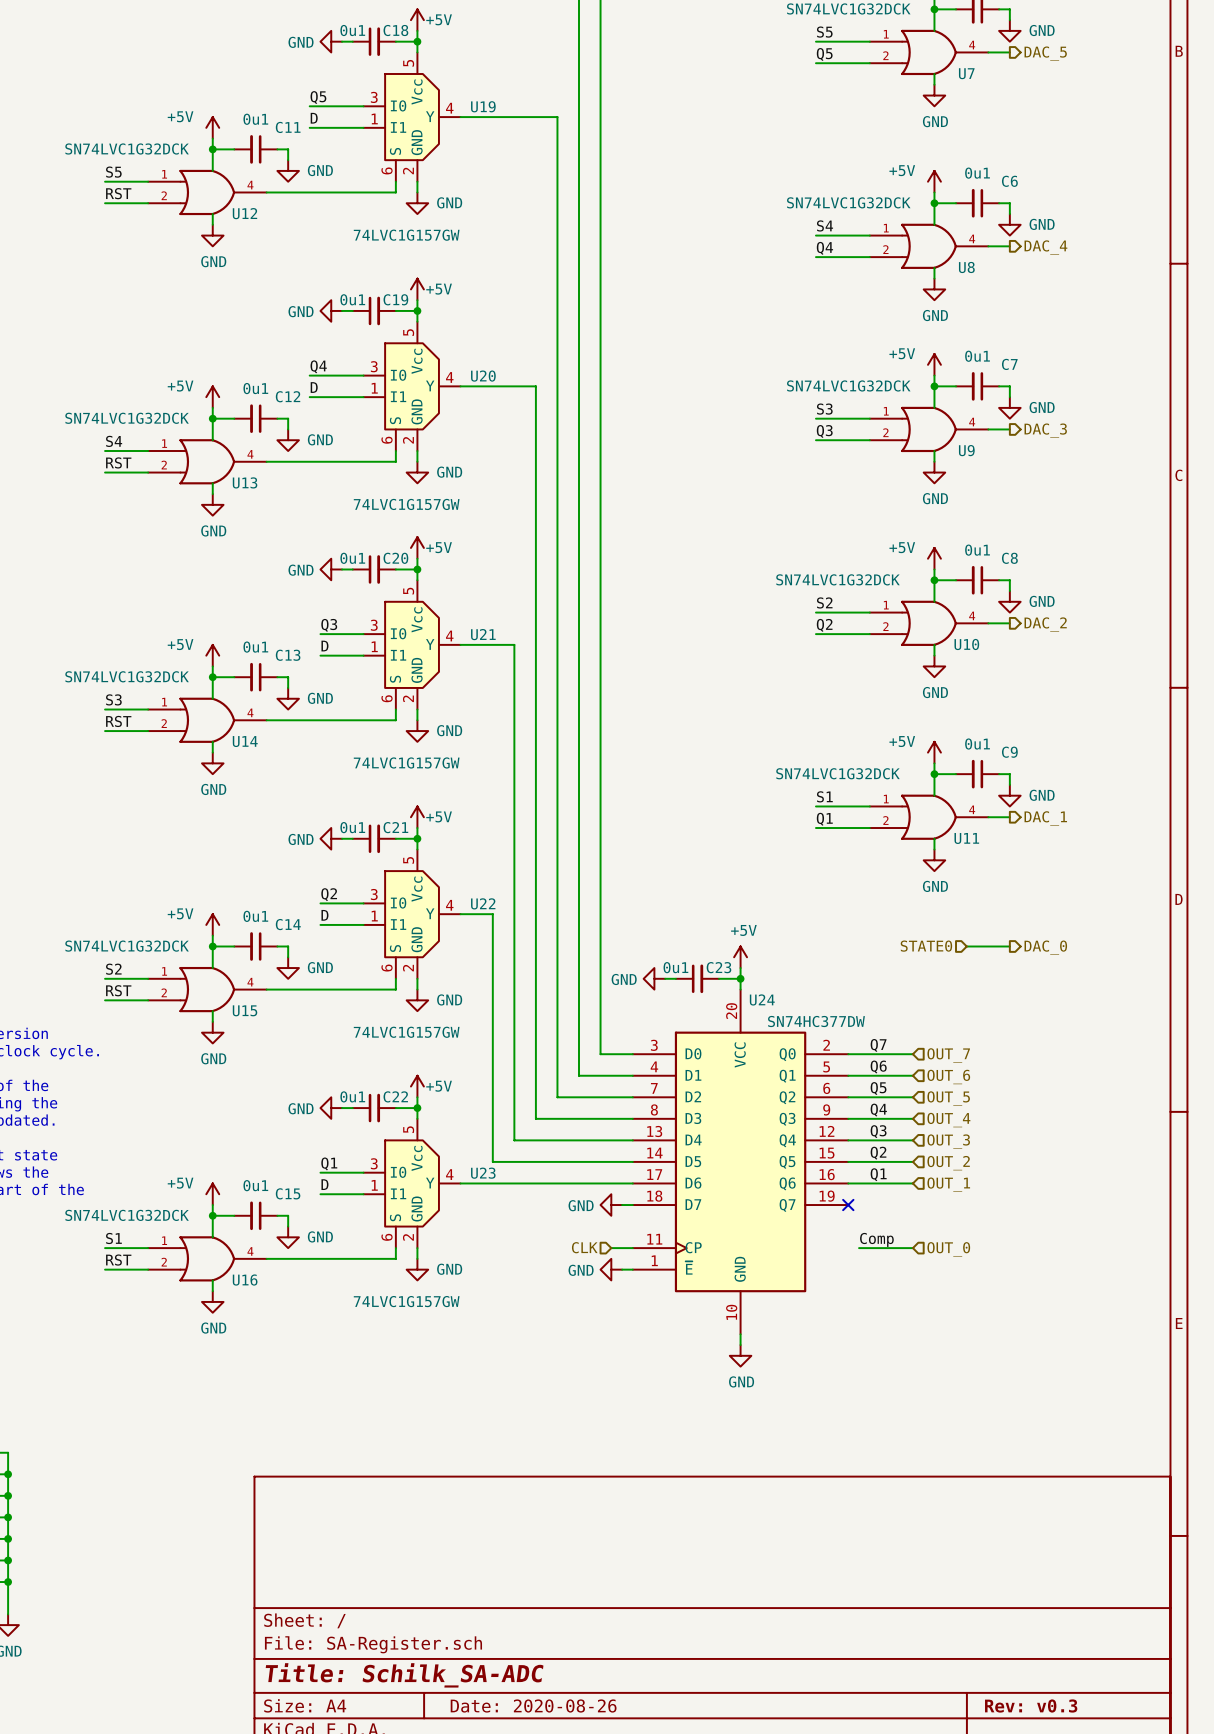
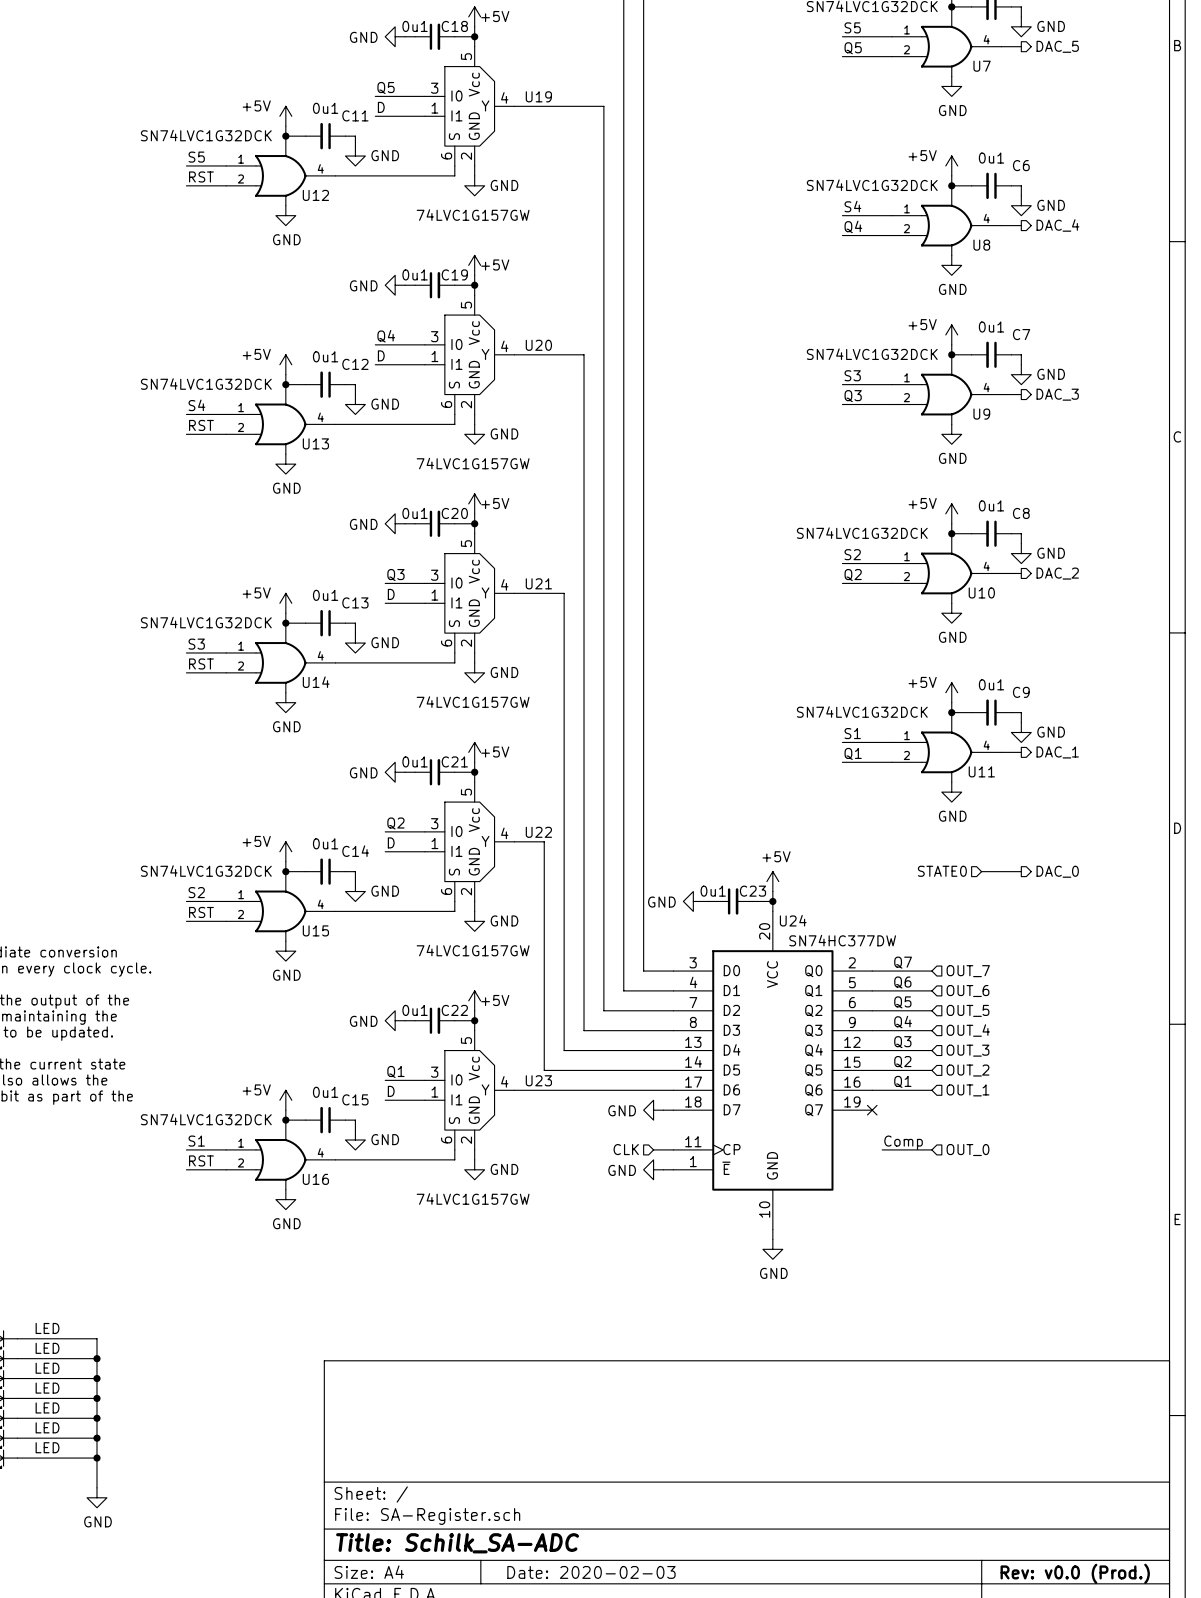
title block: Date: 2020-08-26 (533, 1705) -> Date: 2020-02-03 (591, 1572)
title block: Rev: v0.3 (1031, 1705) -> Rev: v0.0 (Prod.) (1075, 1573)

